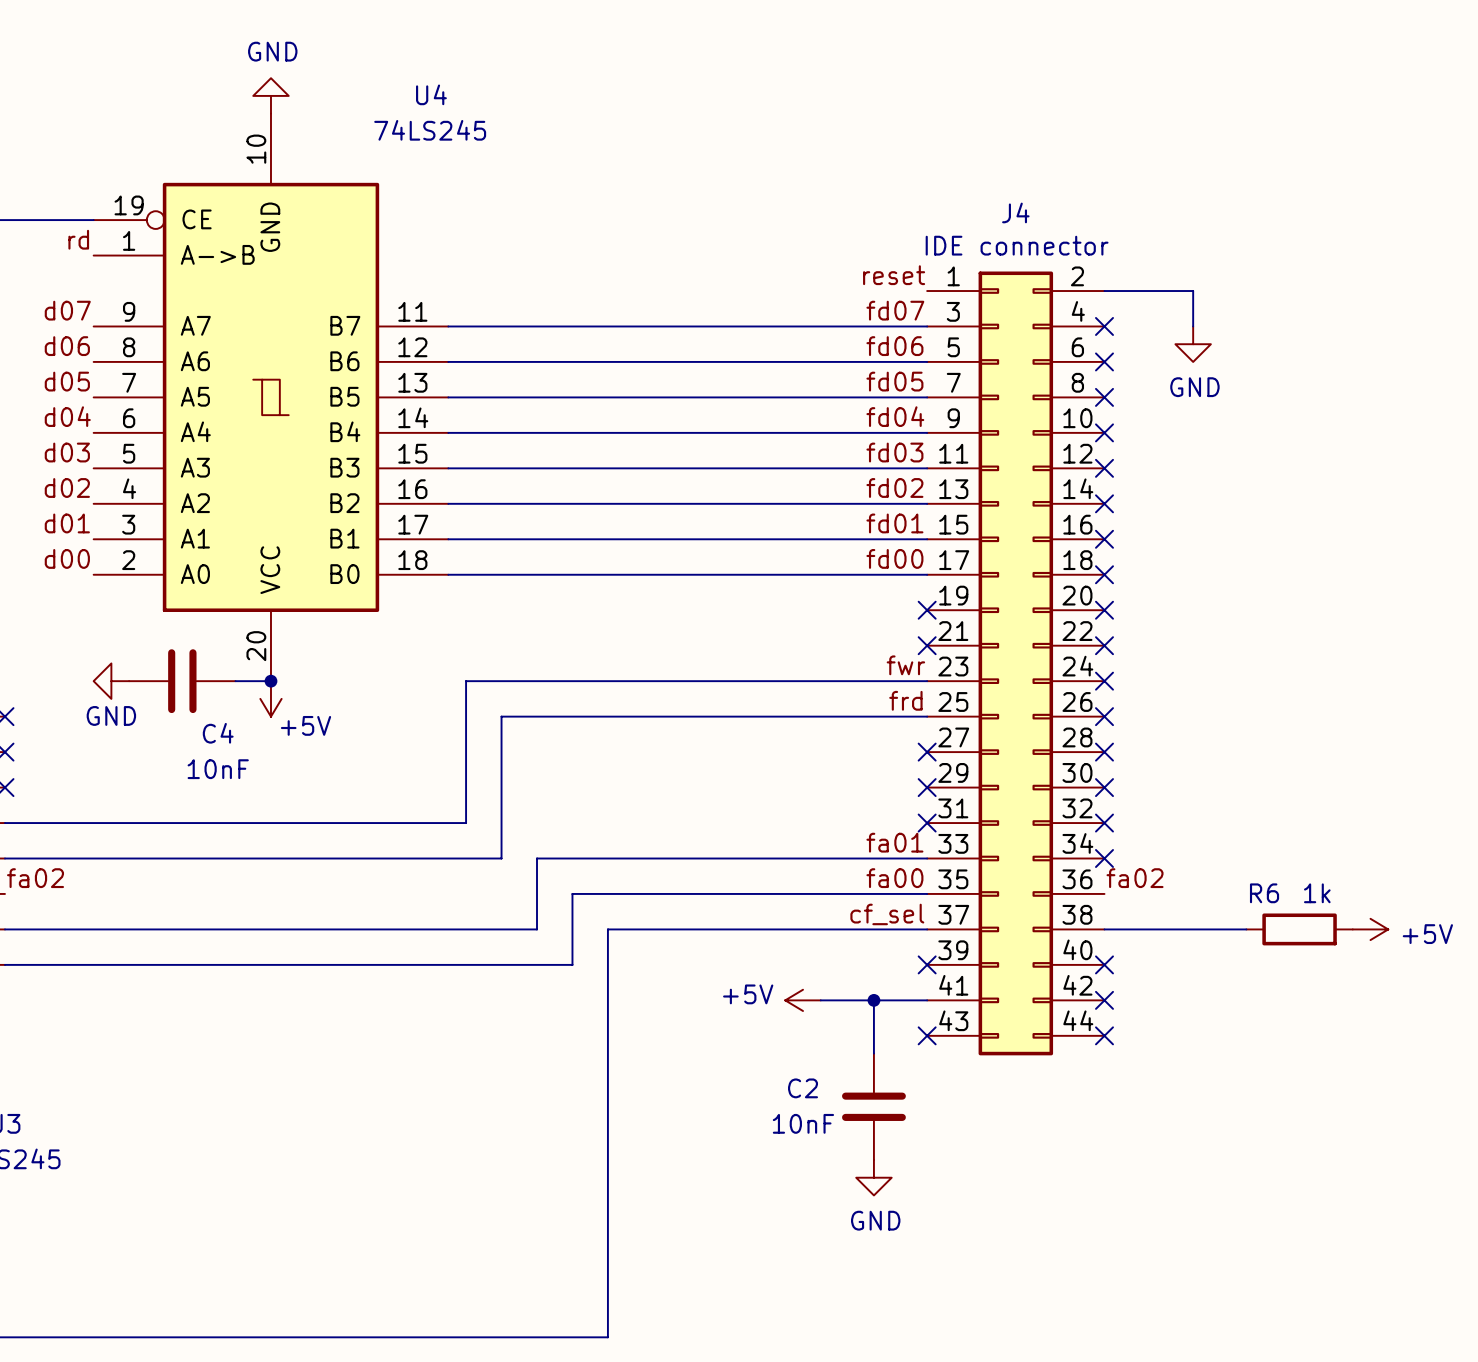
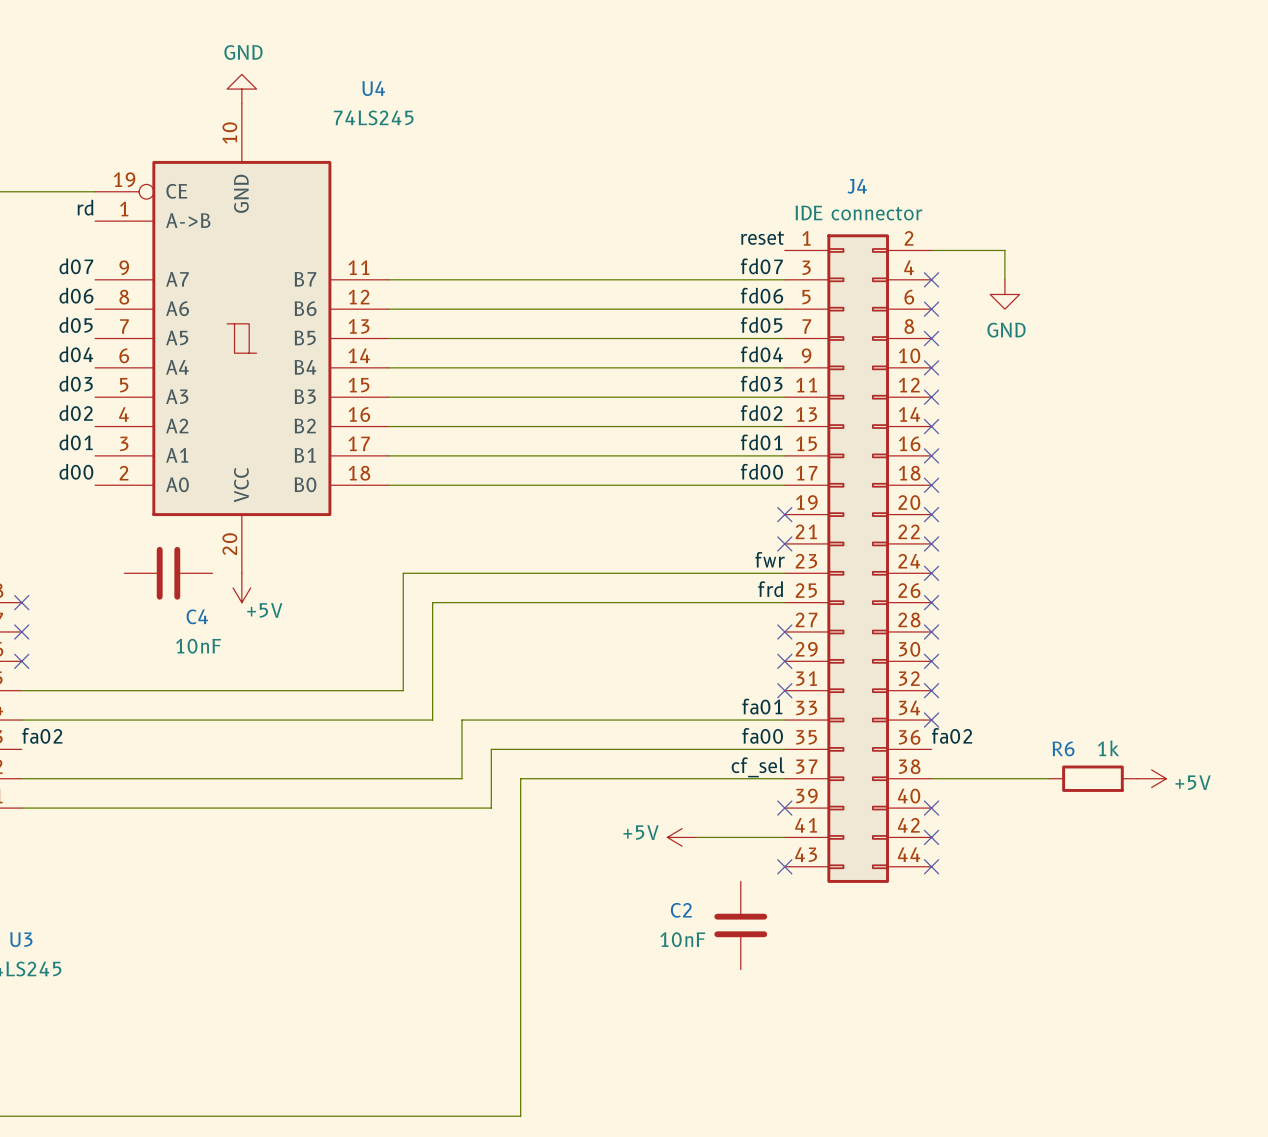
power symbol: GND (111, 681) -> none
wire: (235, 681) (270, 681) -> none
junction: (270, 681) -> none
wire: (873, 1000) (873, 1053) -> none
junction: (873, 1000) -> none
power symbol: GND (873, 1177) -> none

